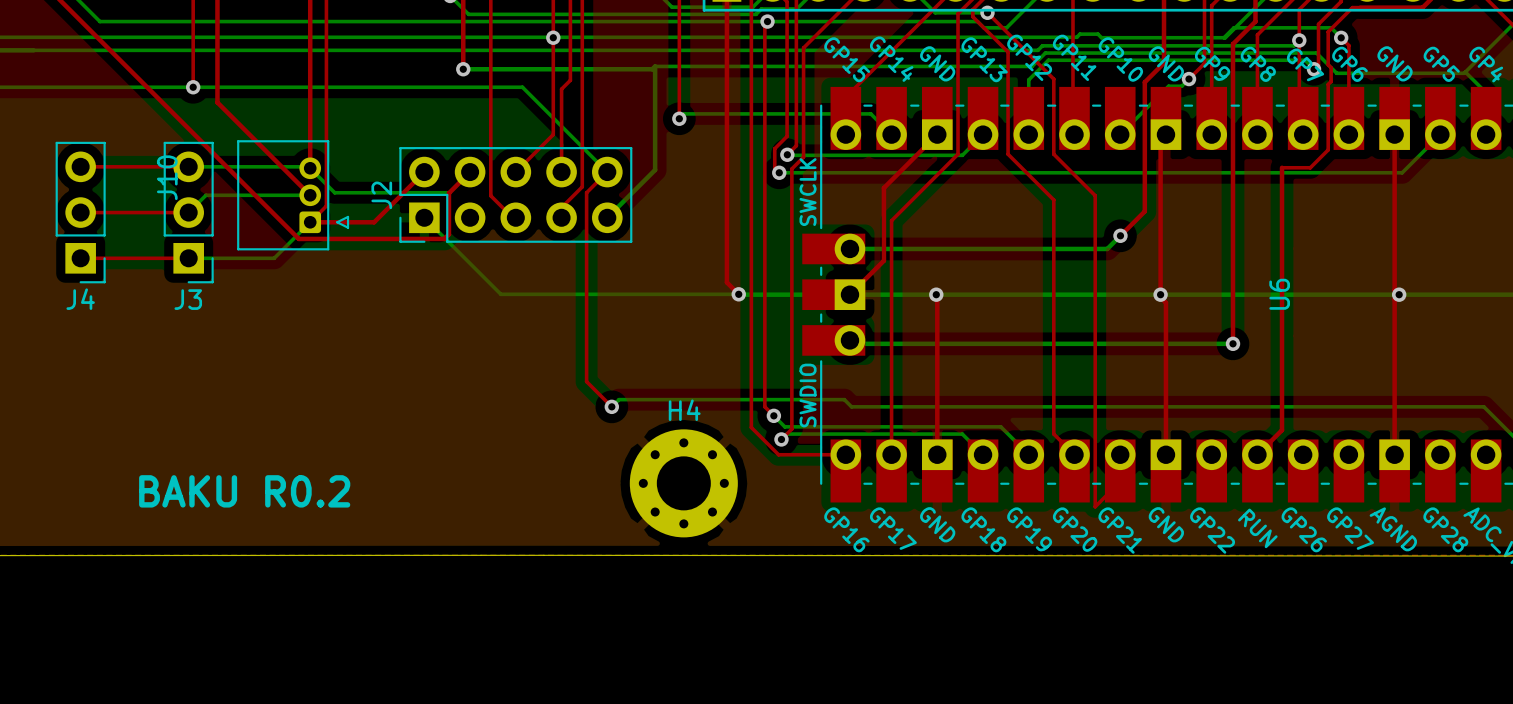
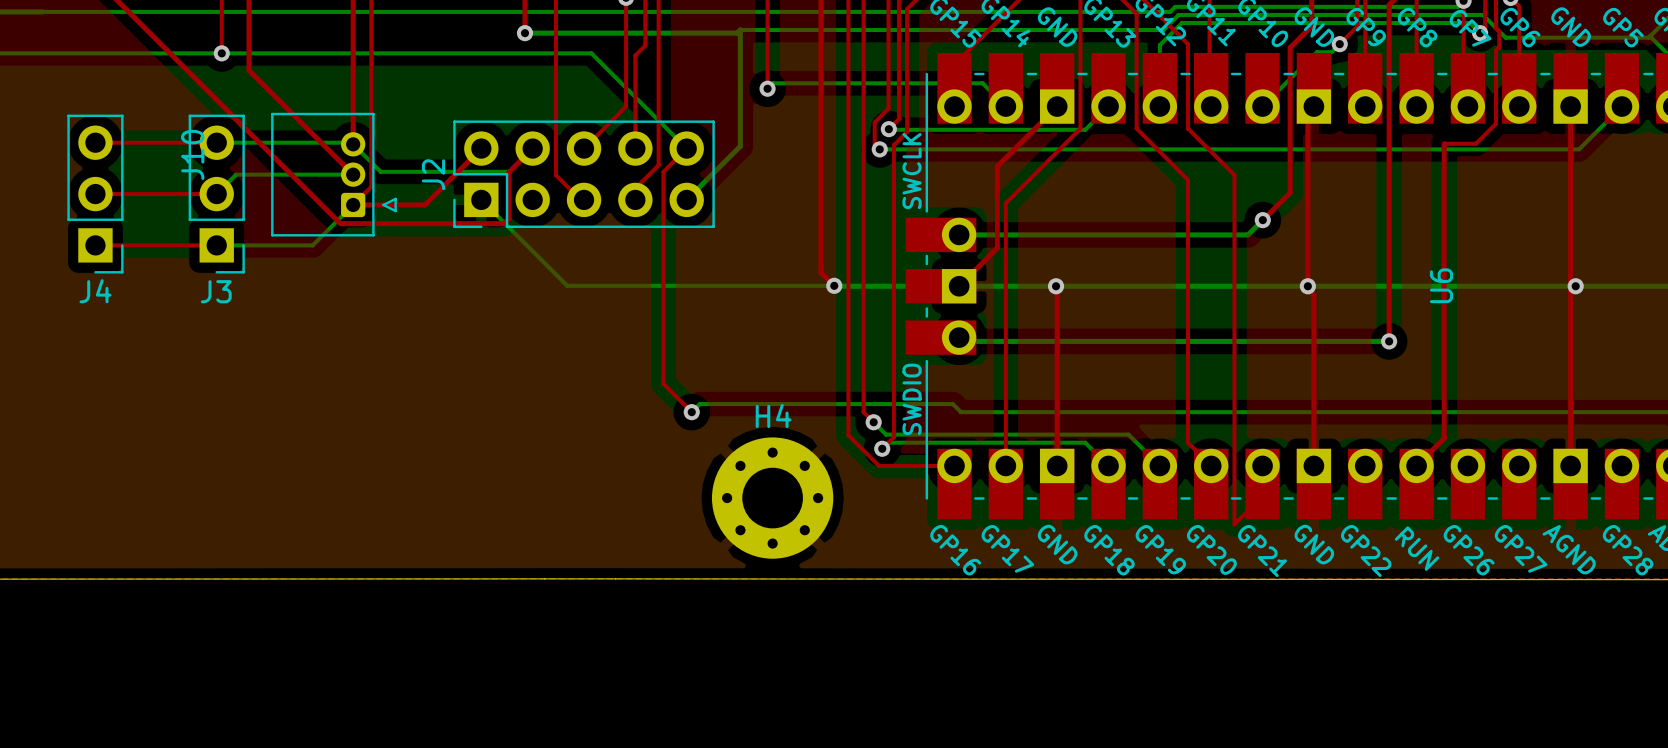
text: BAKU R0.2 (244, 491) -> none

